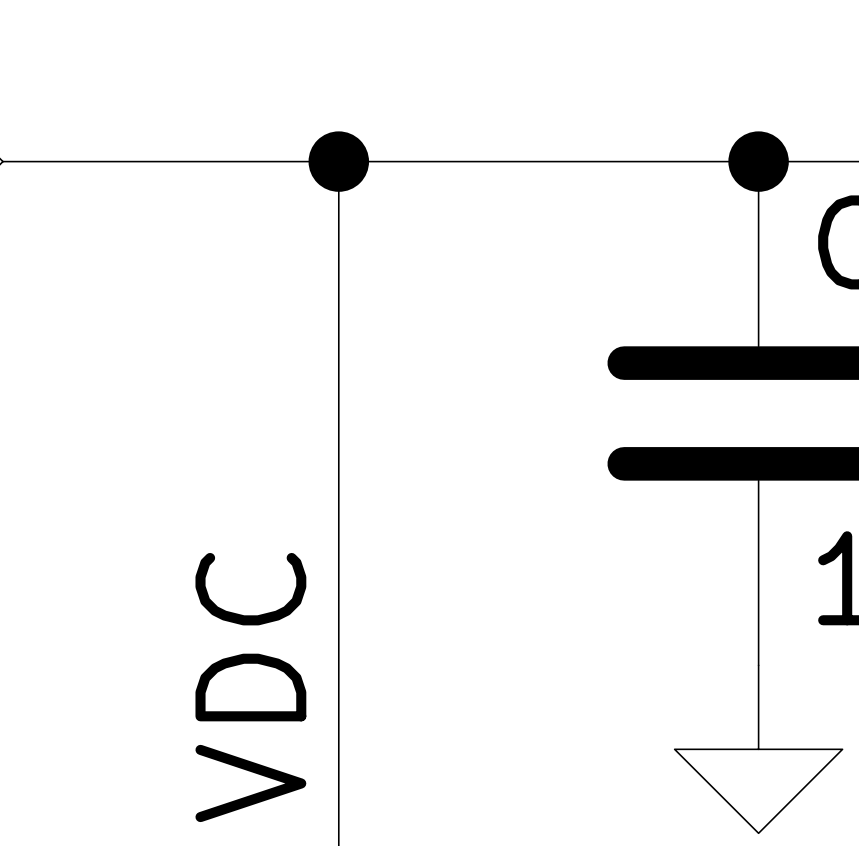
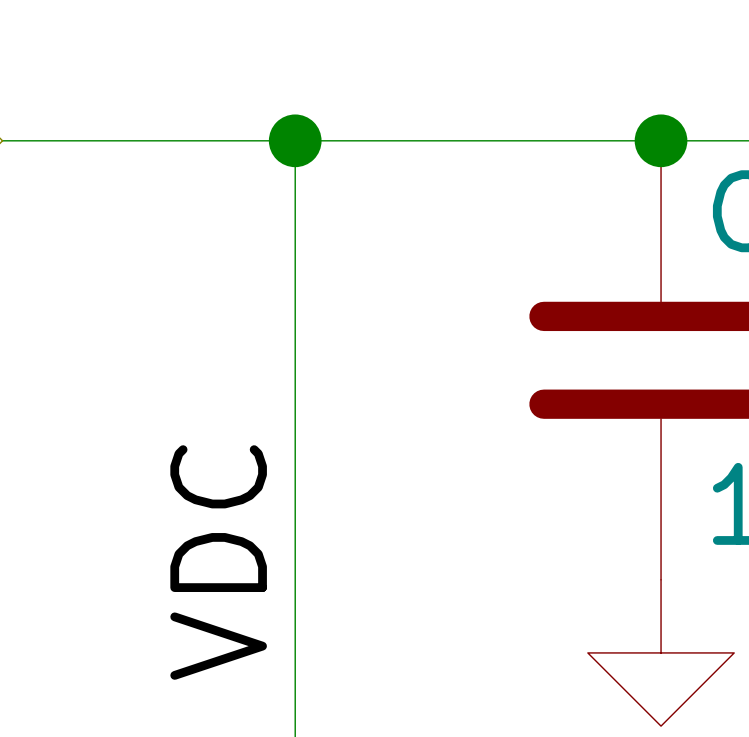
label position: VDC (250, 687) -> VDC (218, 562)

